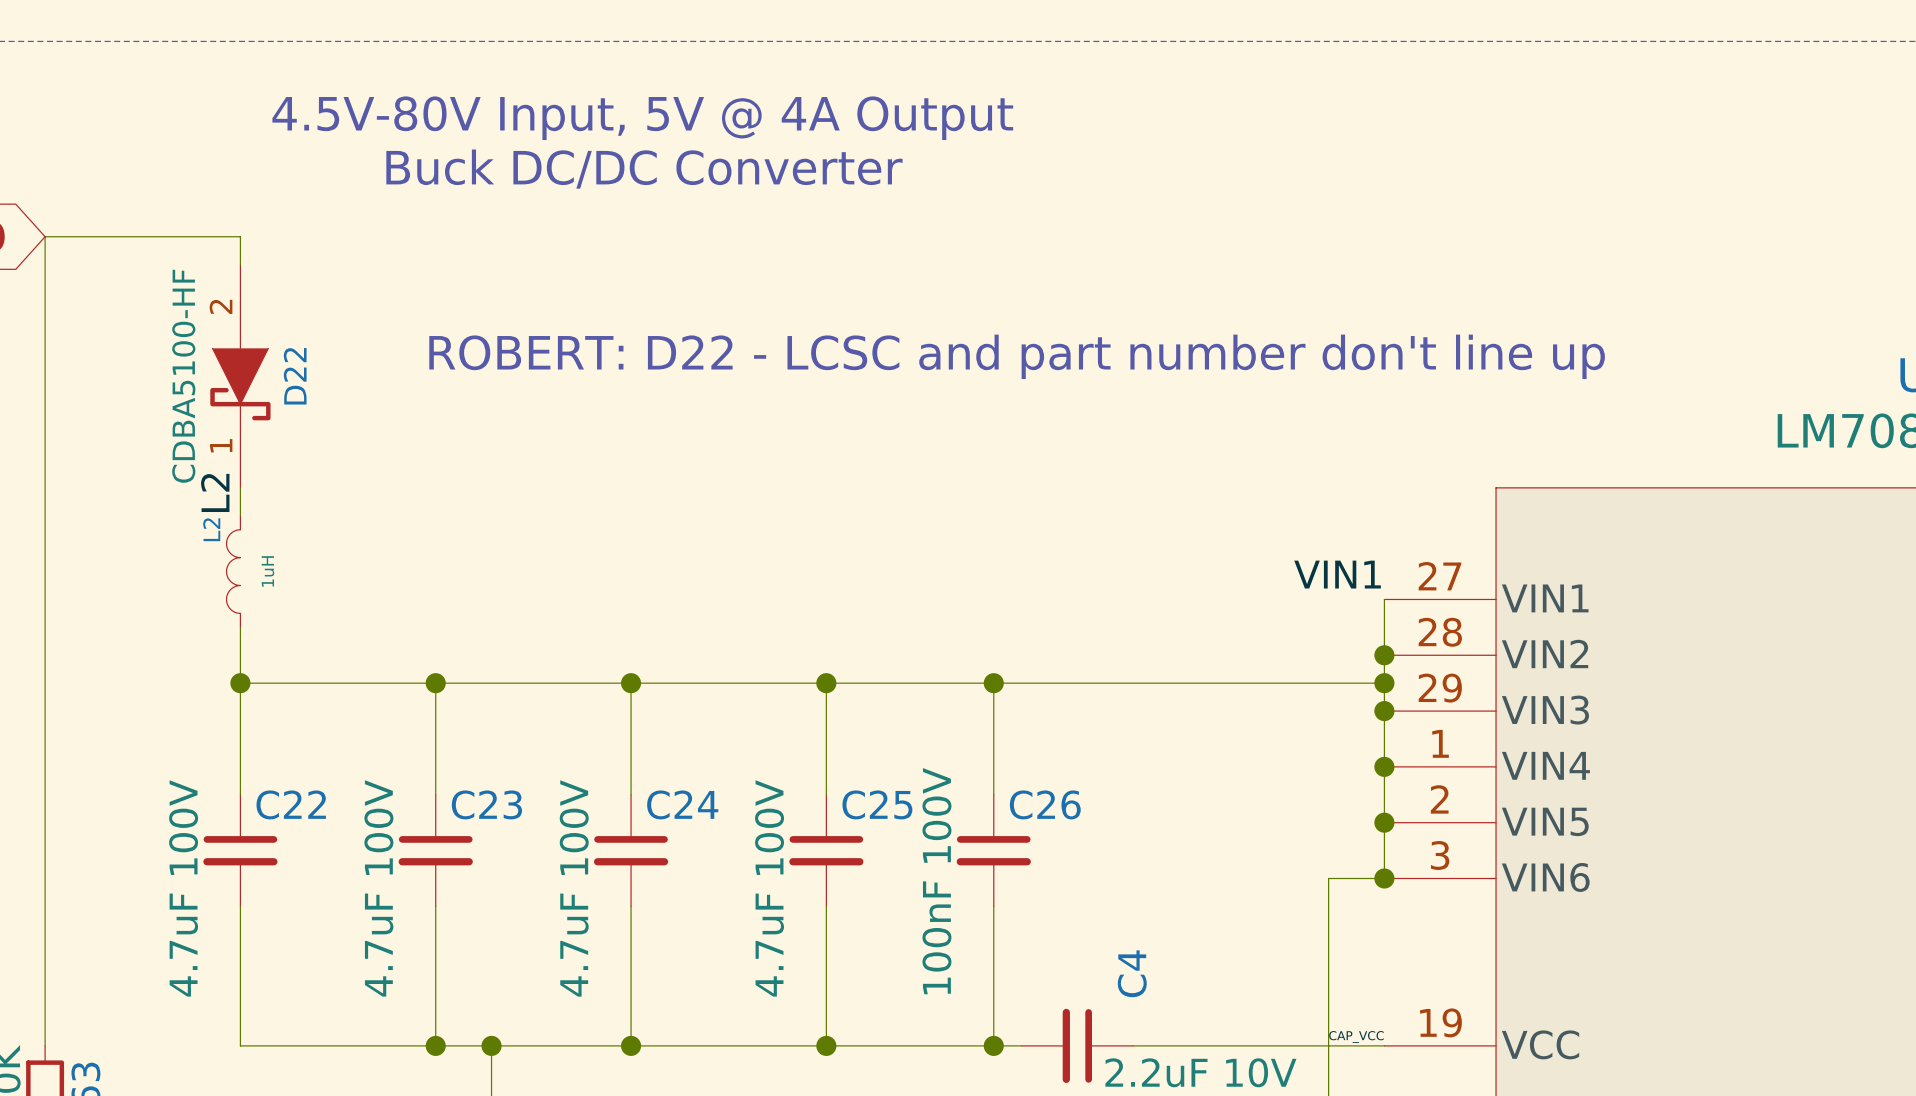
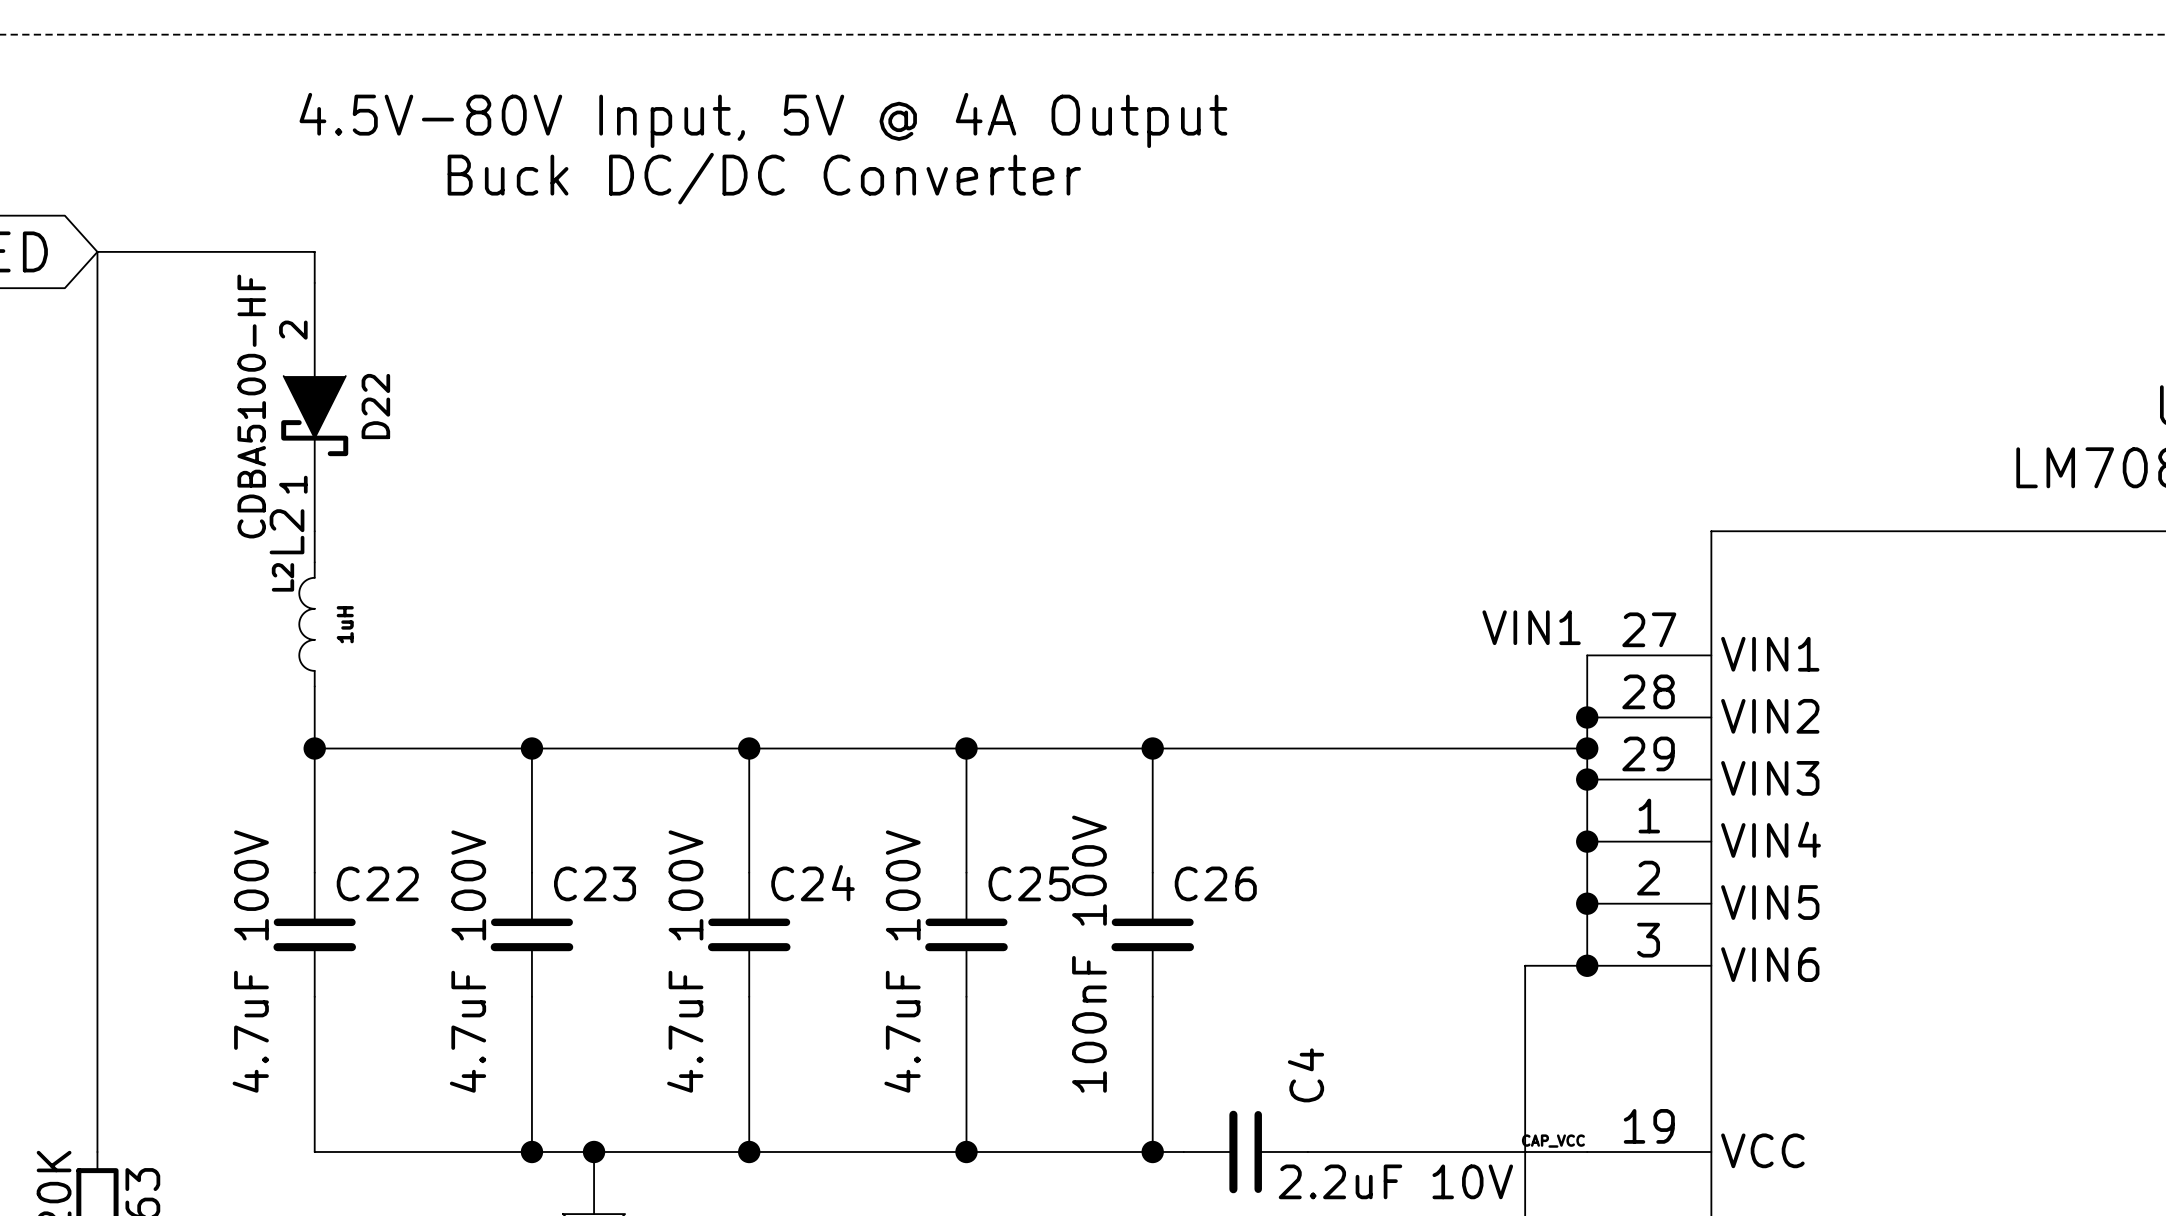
text: ROBERT: D22 - LCSC and part number don't line up (1017, 356) -> none

